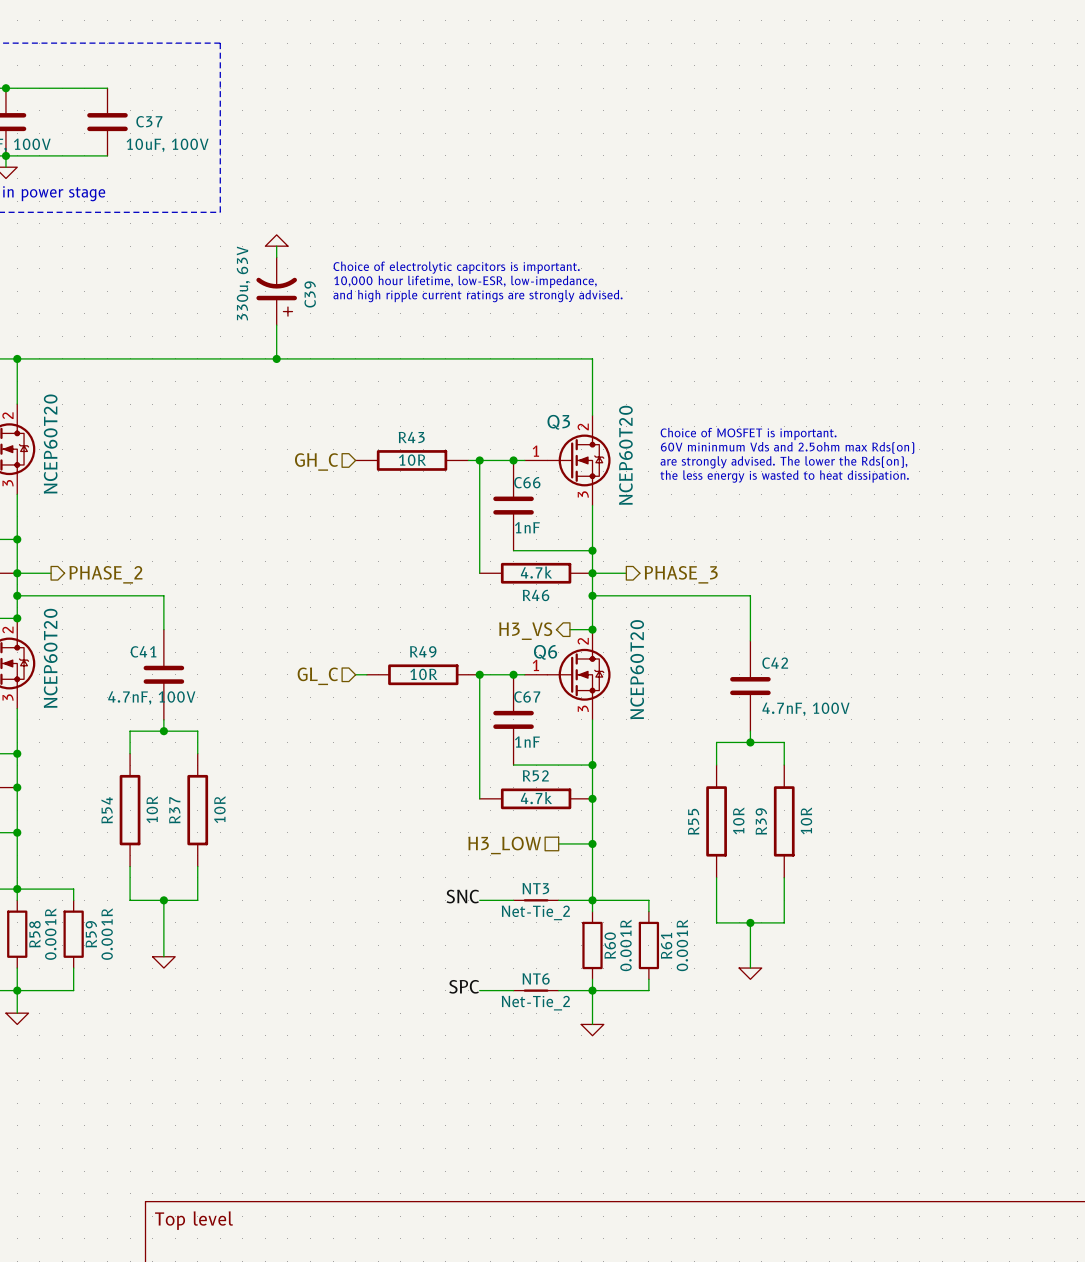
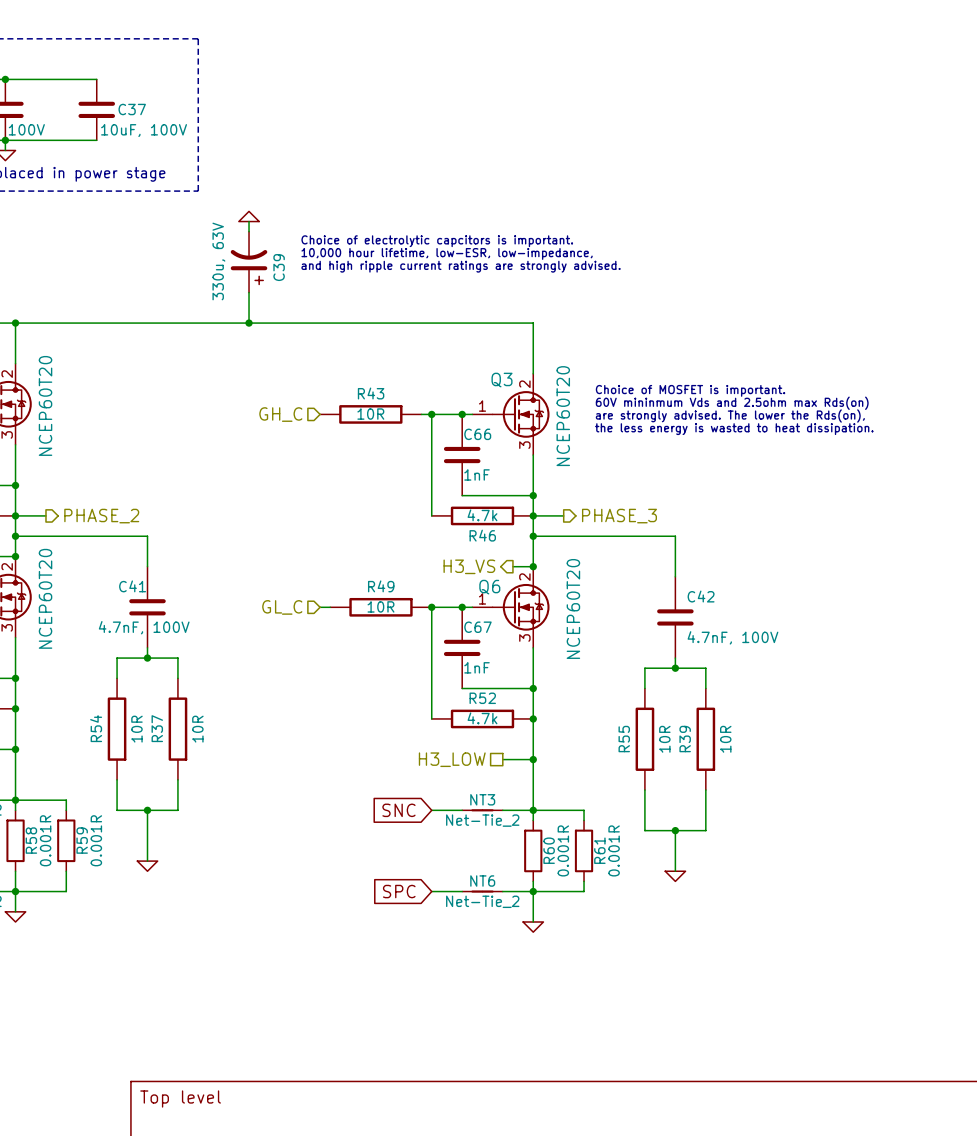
label: SNC (462, 896) -> none
global label: none -> SNC (398, 810)
label: SPC (464, 986) -> none
global label: none -> SPC (399, 891)

